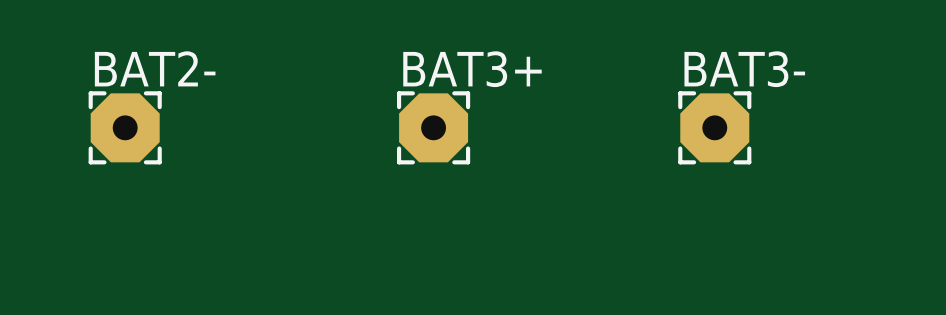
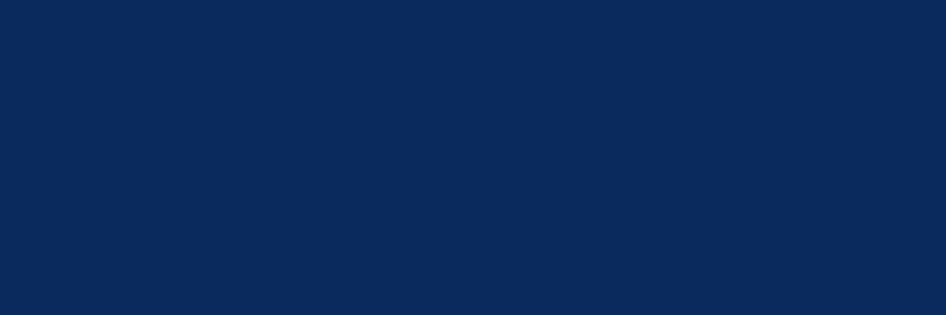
BAT2-: (125, 127) -> none
BAT3+: (433, 127) -> none
BAT3-: (714, 127) -> none

